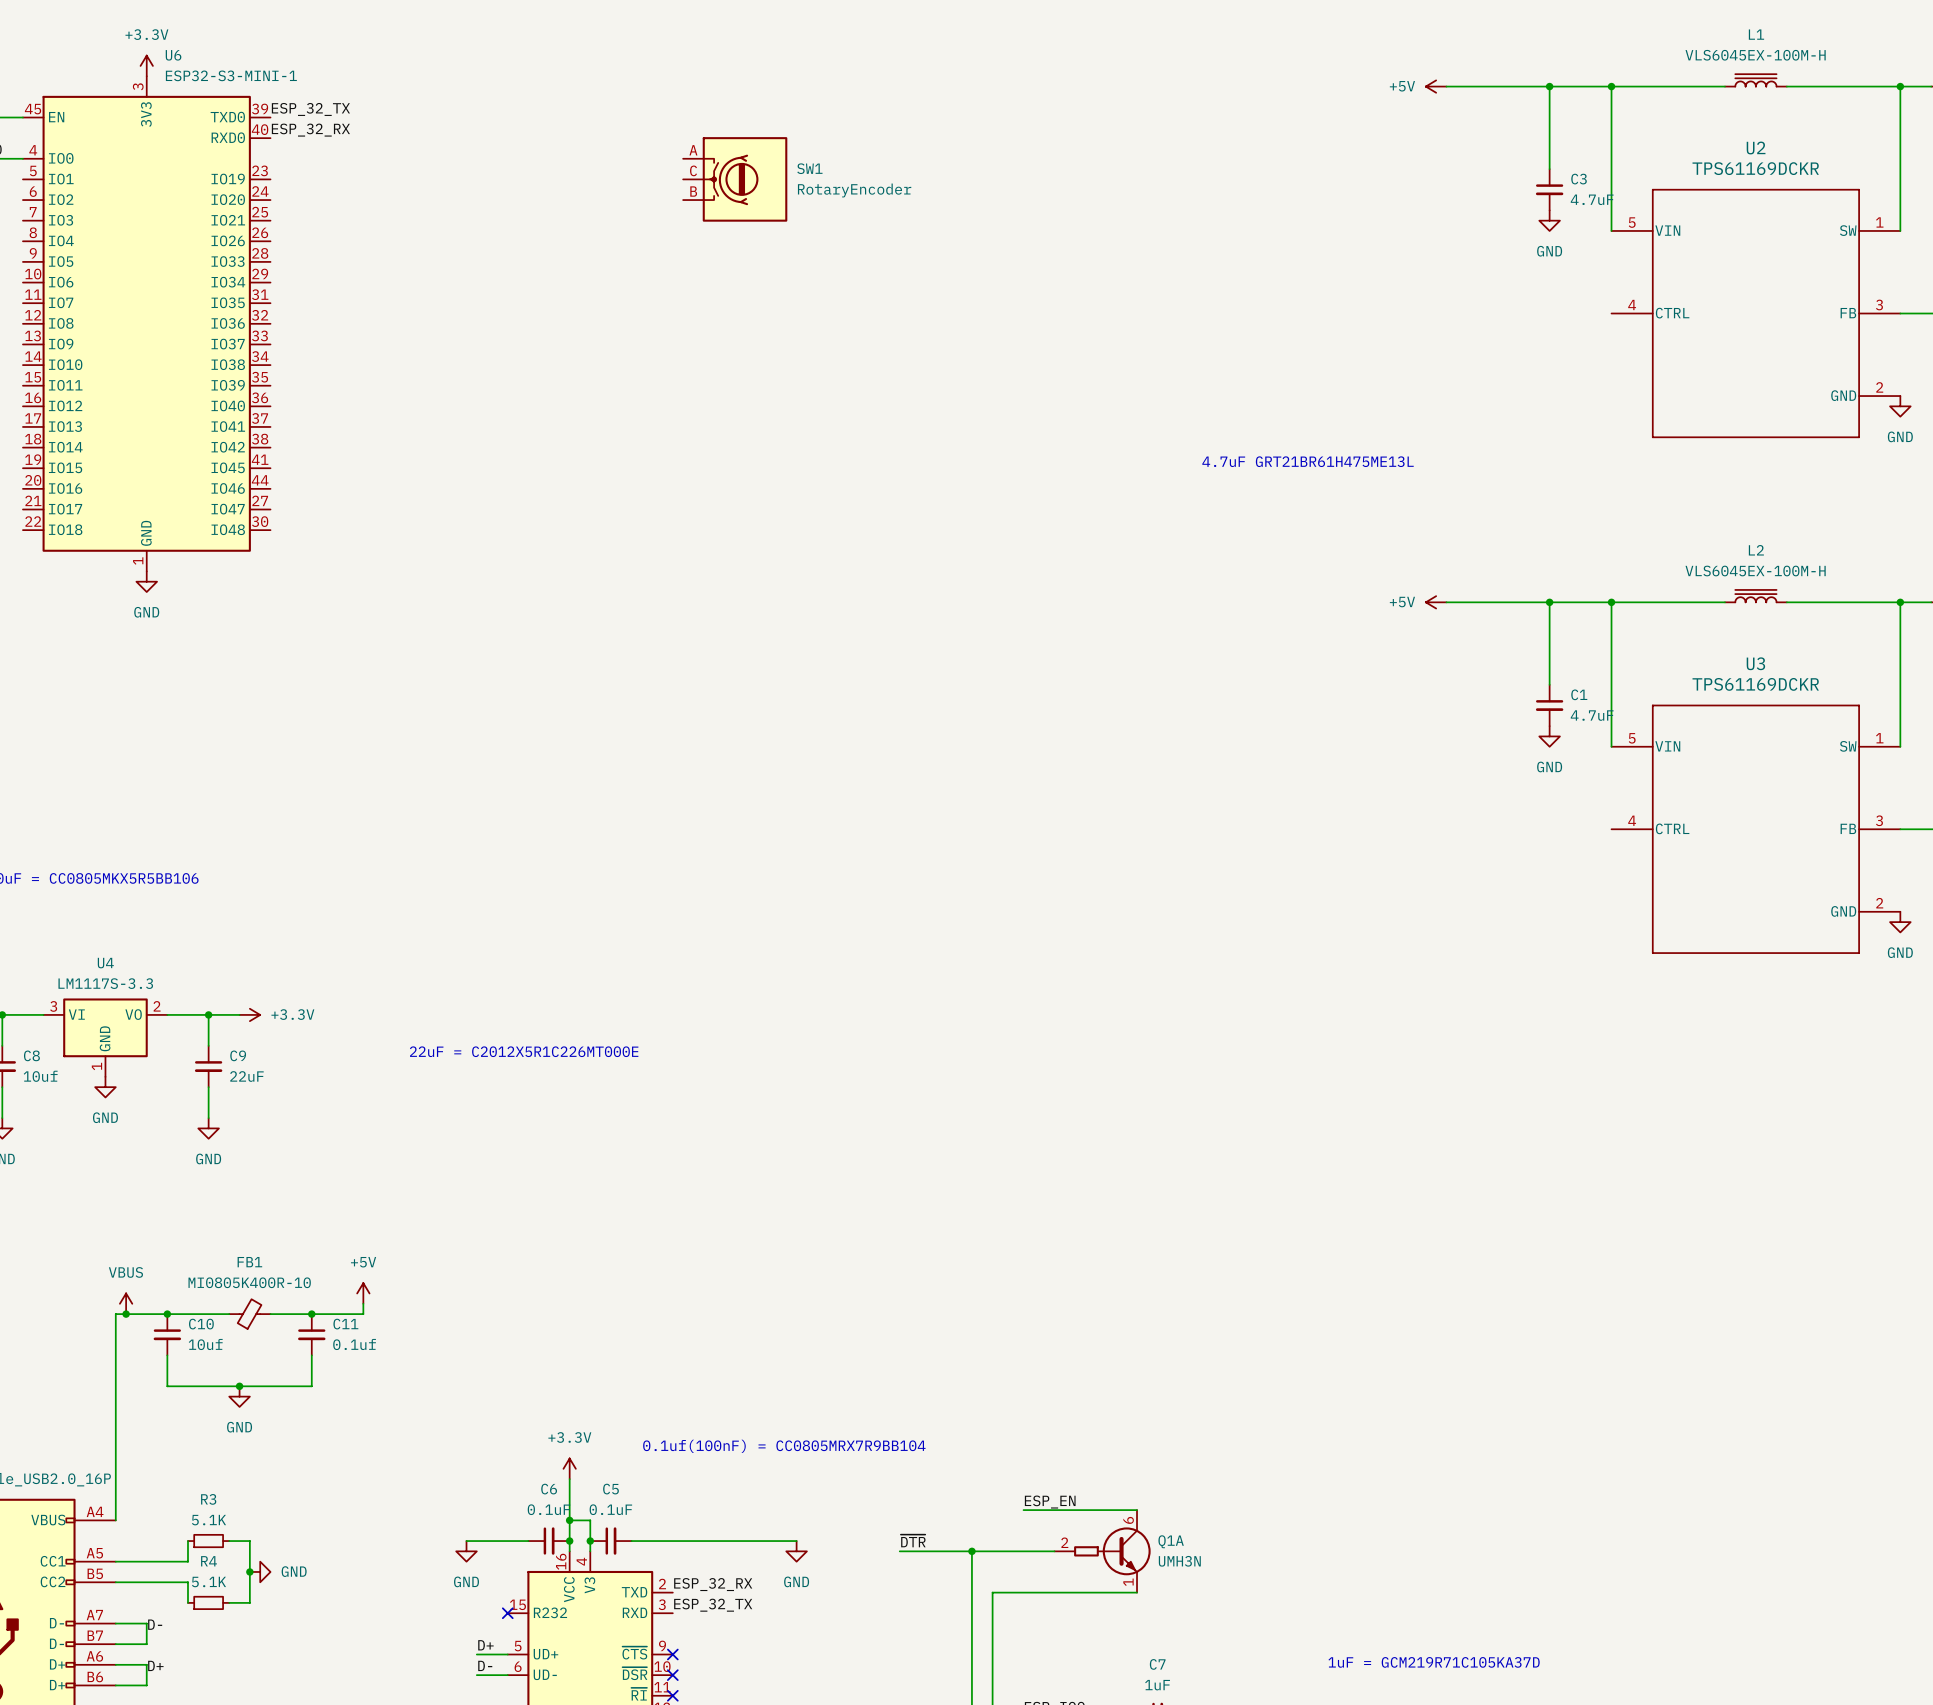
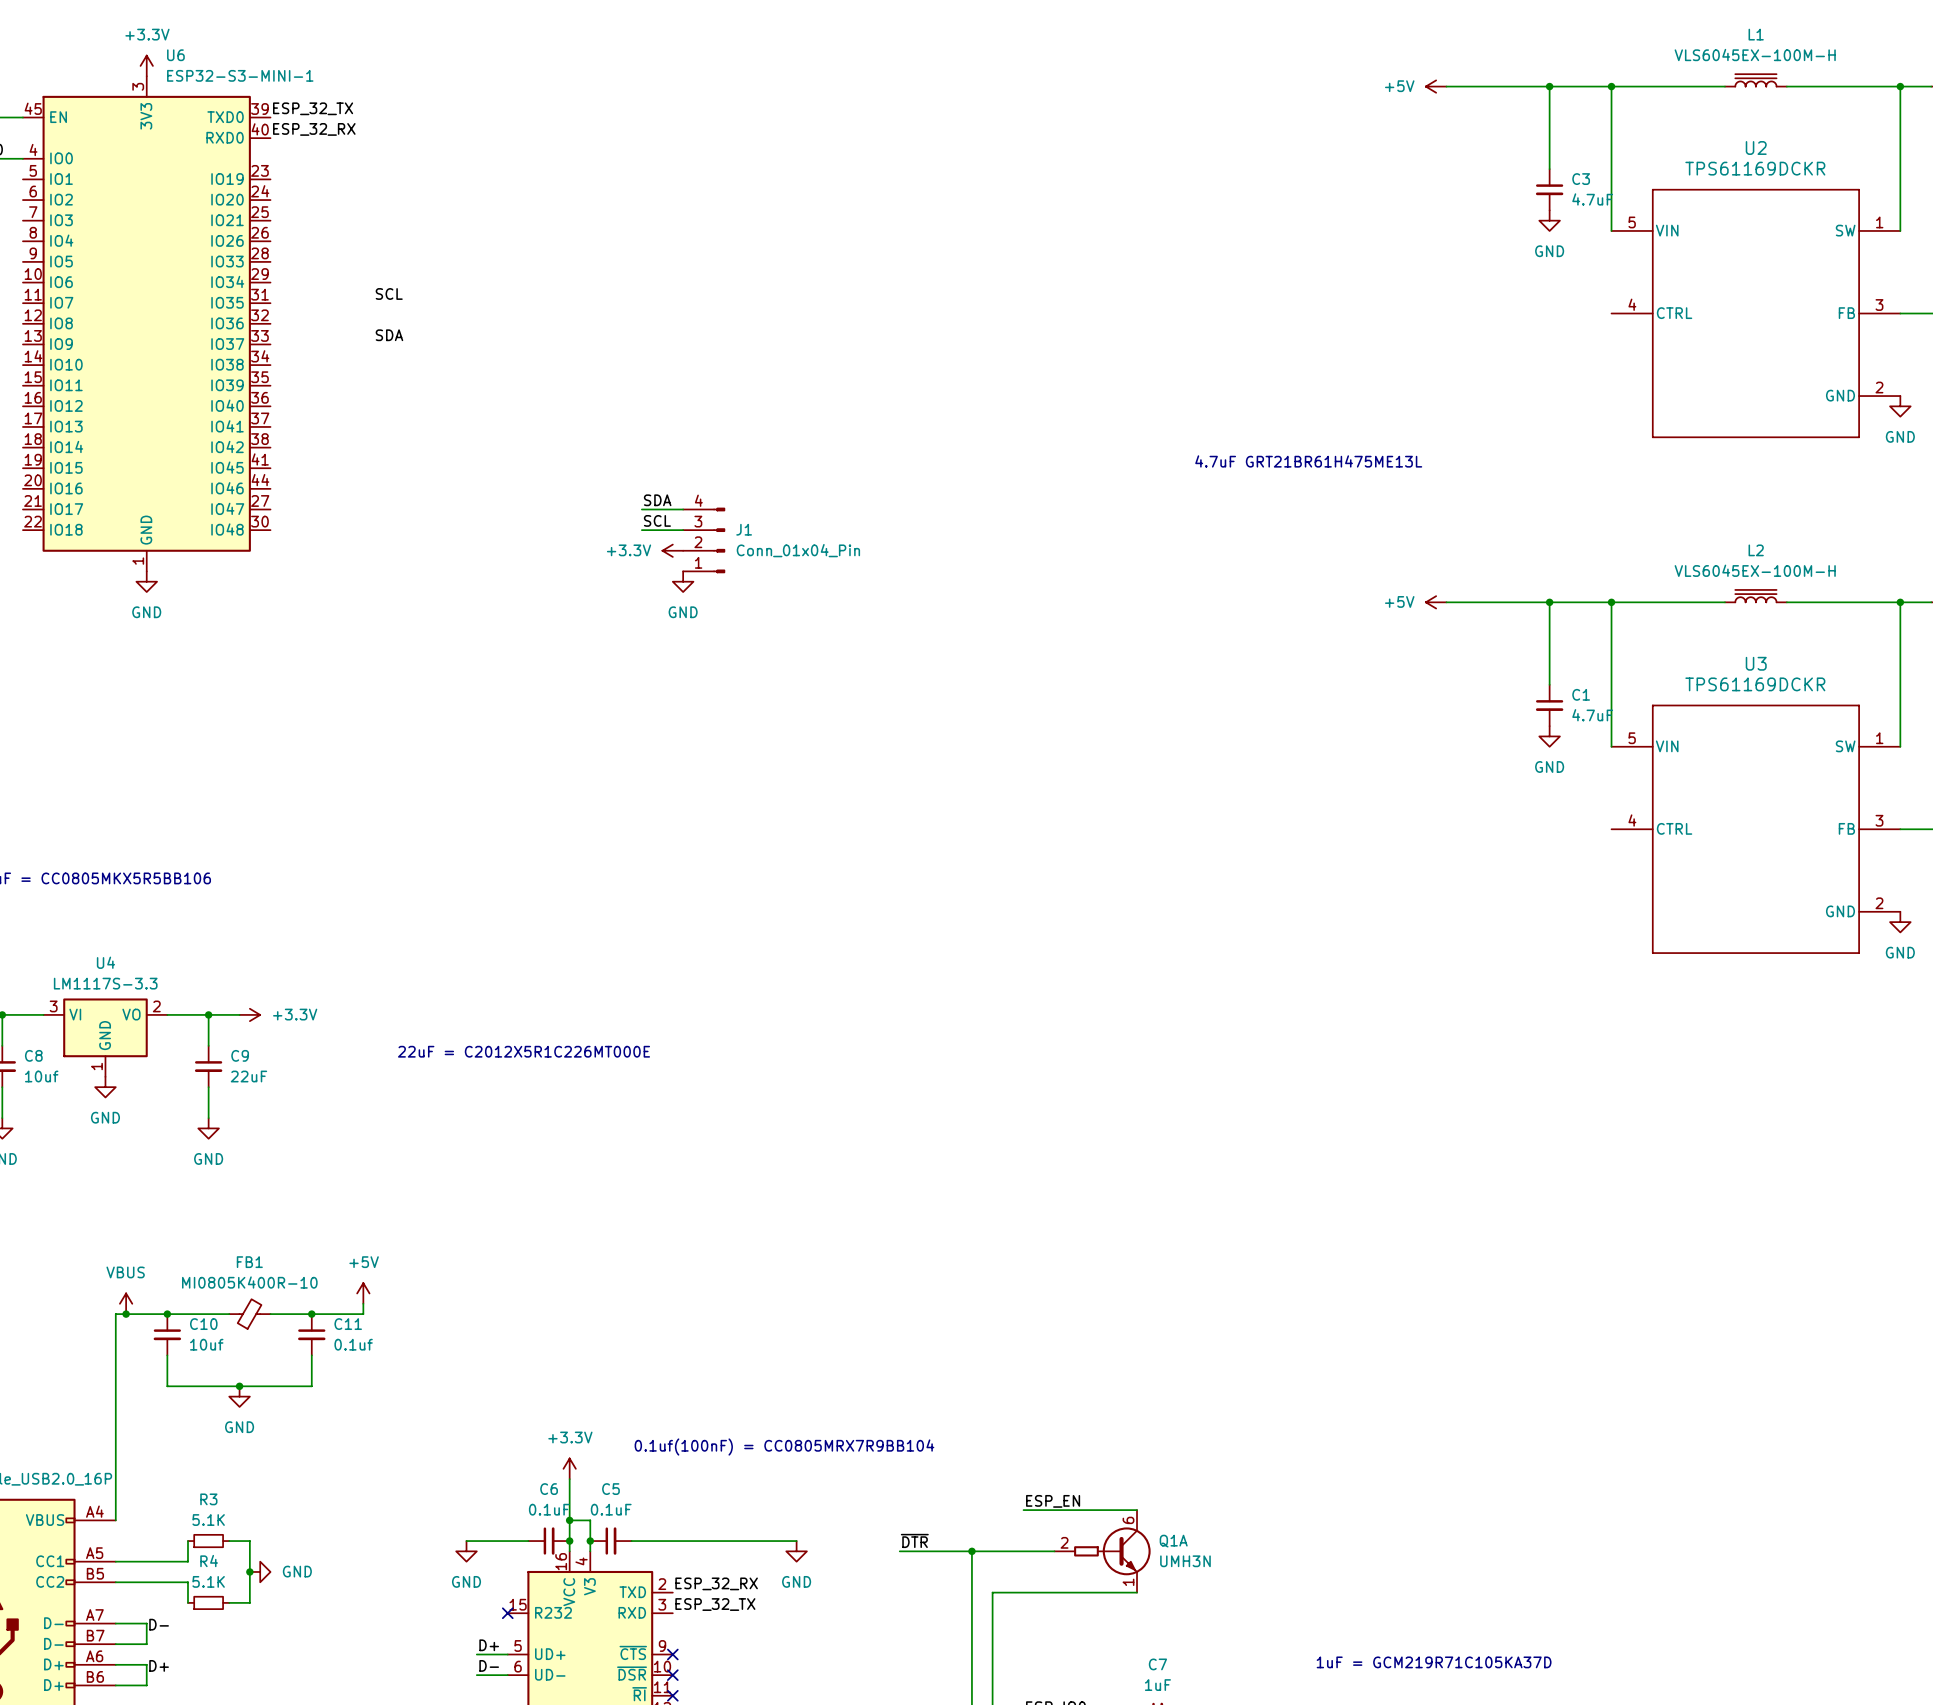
SW1: RotaryEncoder (735, 179) -> none
label: none -> SCL (389, 293)
label: none -> SDA (389, 335)
label: none -> SDA (657, 500)
wire: none -> (641, 509) (683, 509)
label: none -> SCL (657, 520)
wire: none -> (641, 530) (683, 530)
J1: none -> Conn_01x04_Pin (704, 540)
power symbol: none -> +3.3V (672, 550)
power symbol: none -> GND (683, 581)

